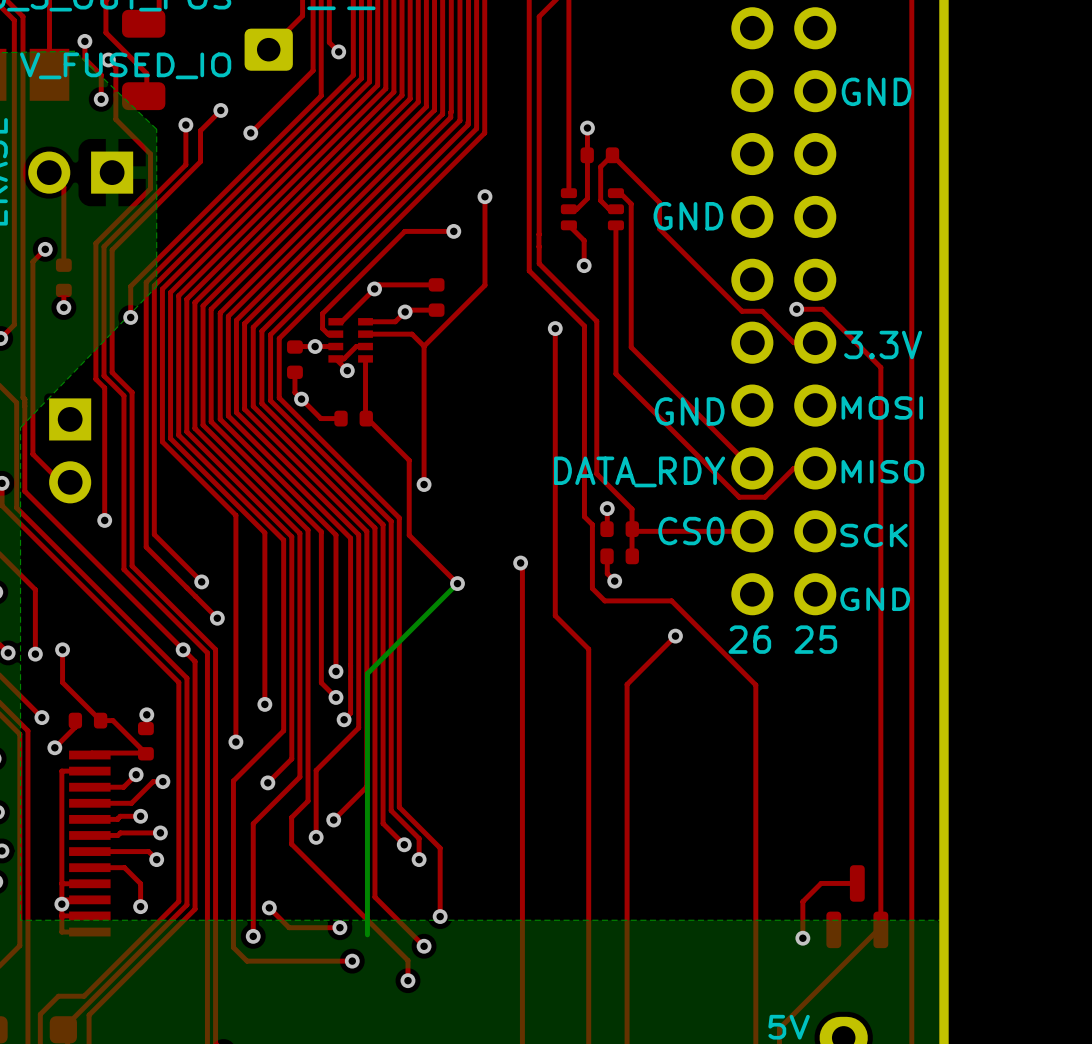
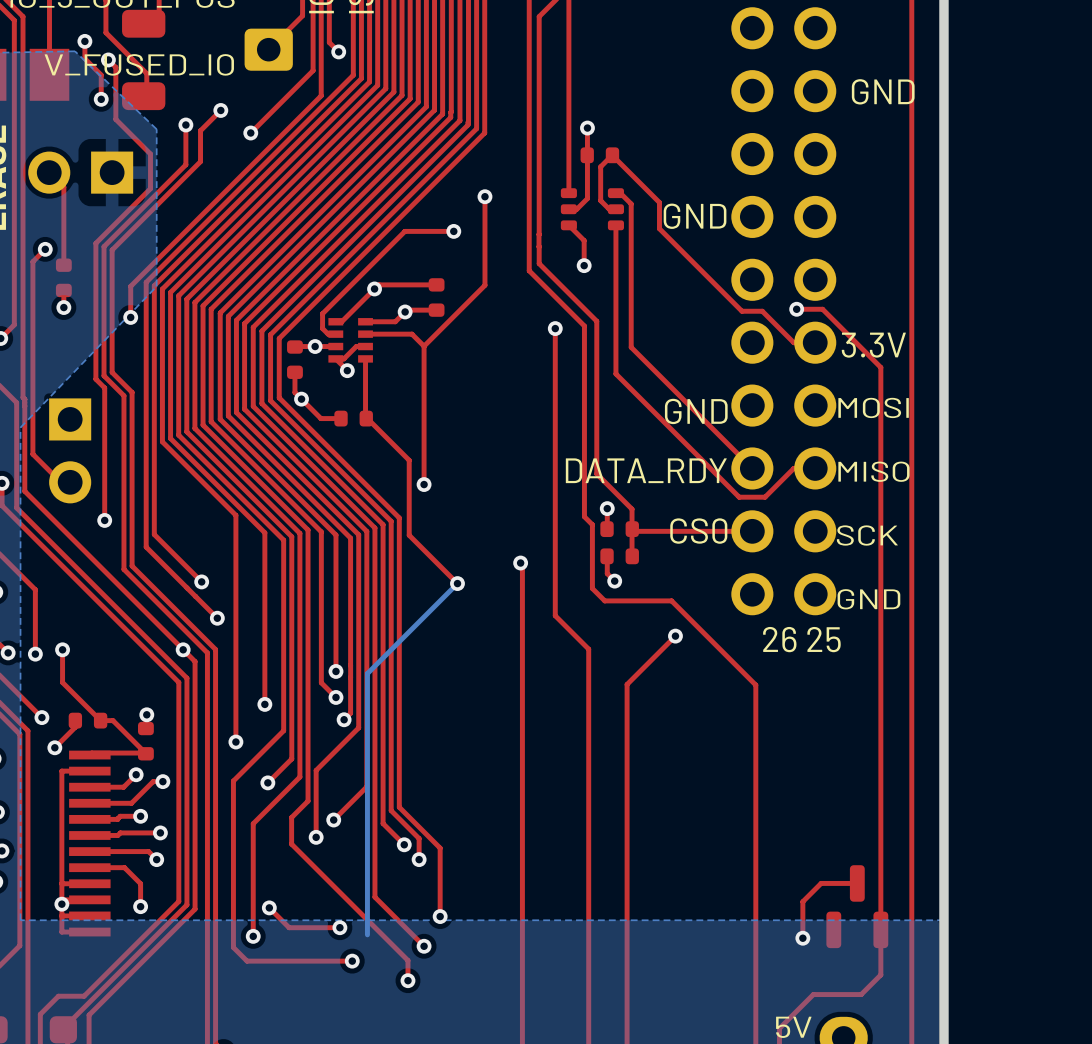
top track: (880, 927) (813, 994) -> (880, 927) (880, 974) (861, 994) (813, 994)

